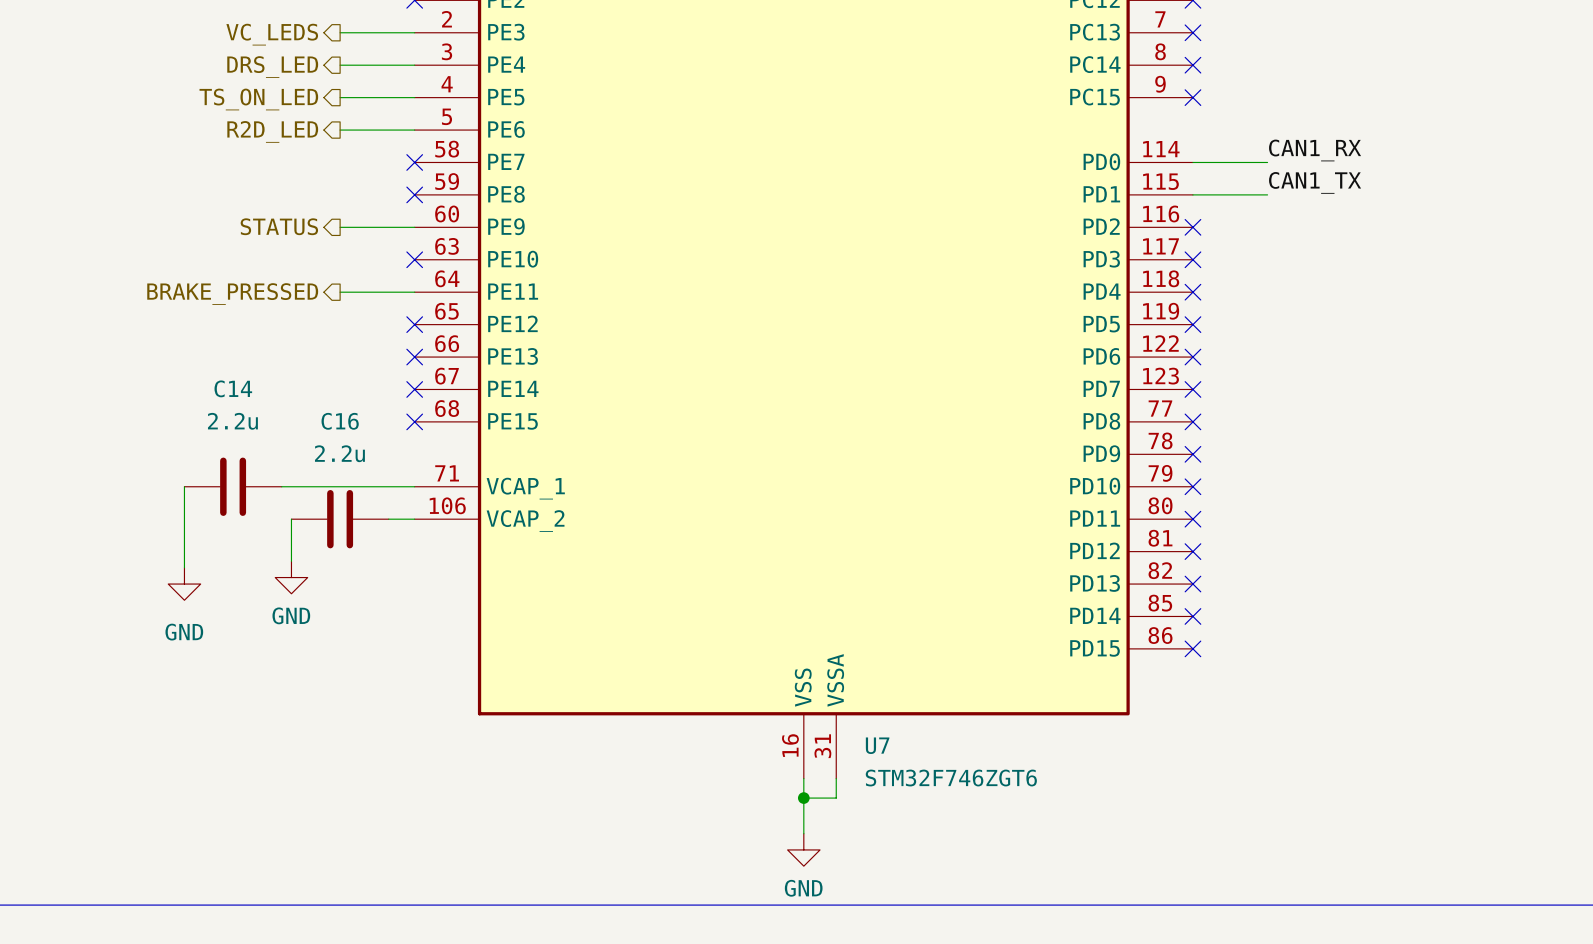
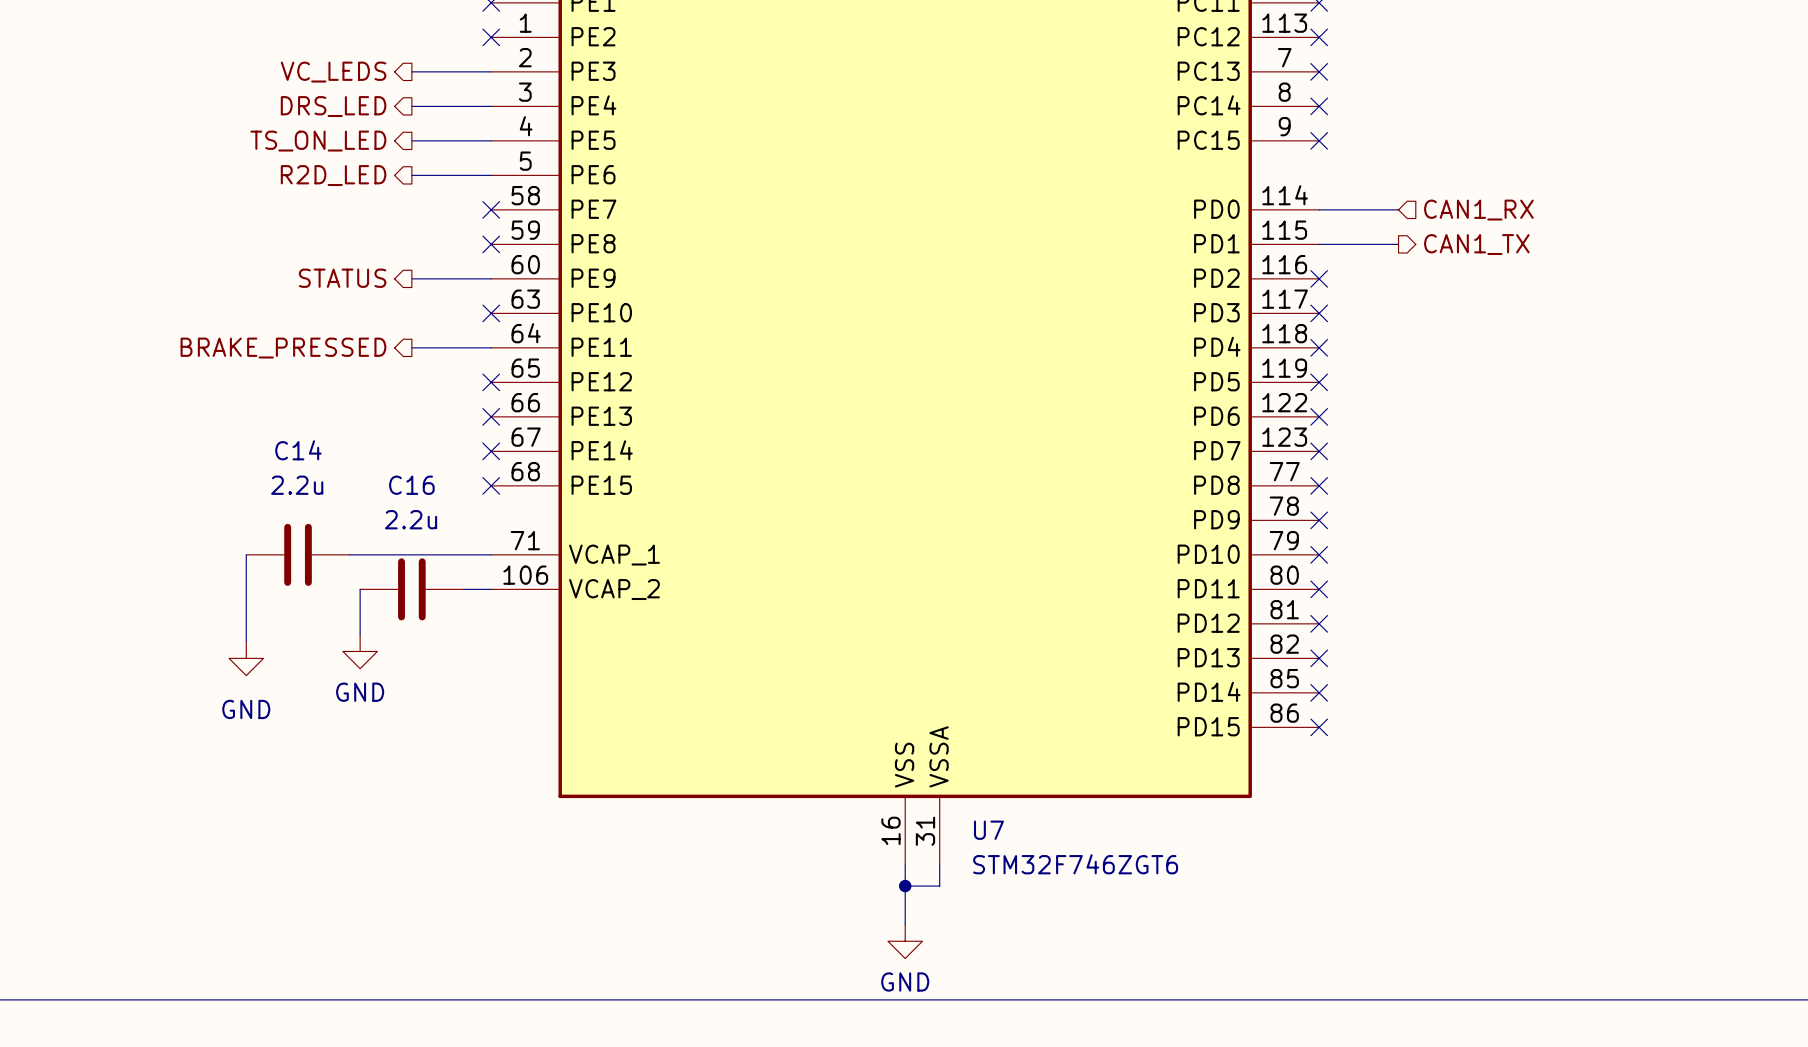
label: CAN1_RX (1315, 150) -> none
hierarchical label: none -> CAN1_RX (1478, 210)
label: CAN1_TX (1315, 182) -> none
hierarchical label: none -> CAN1_TX (1476, 244)

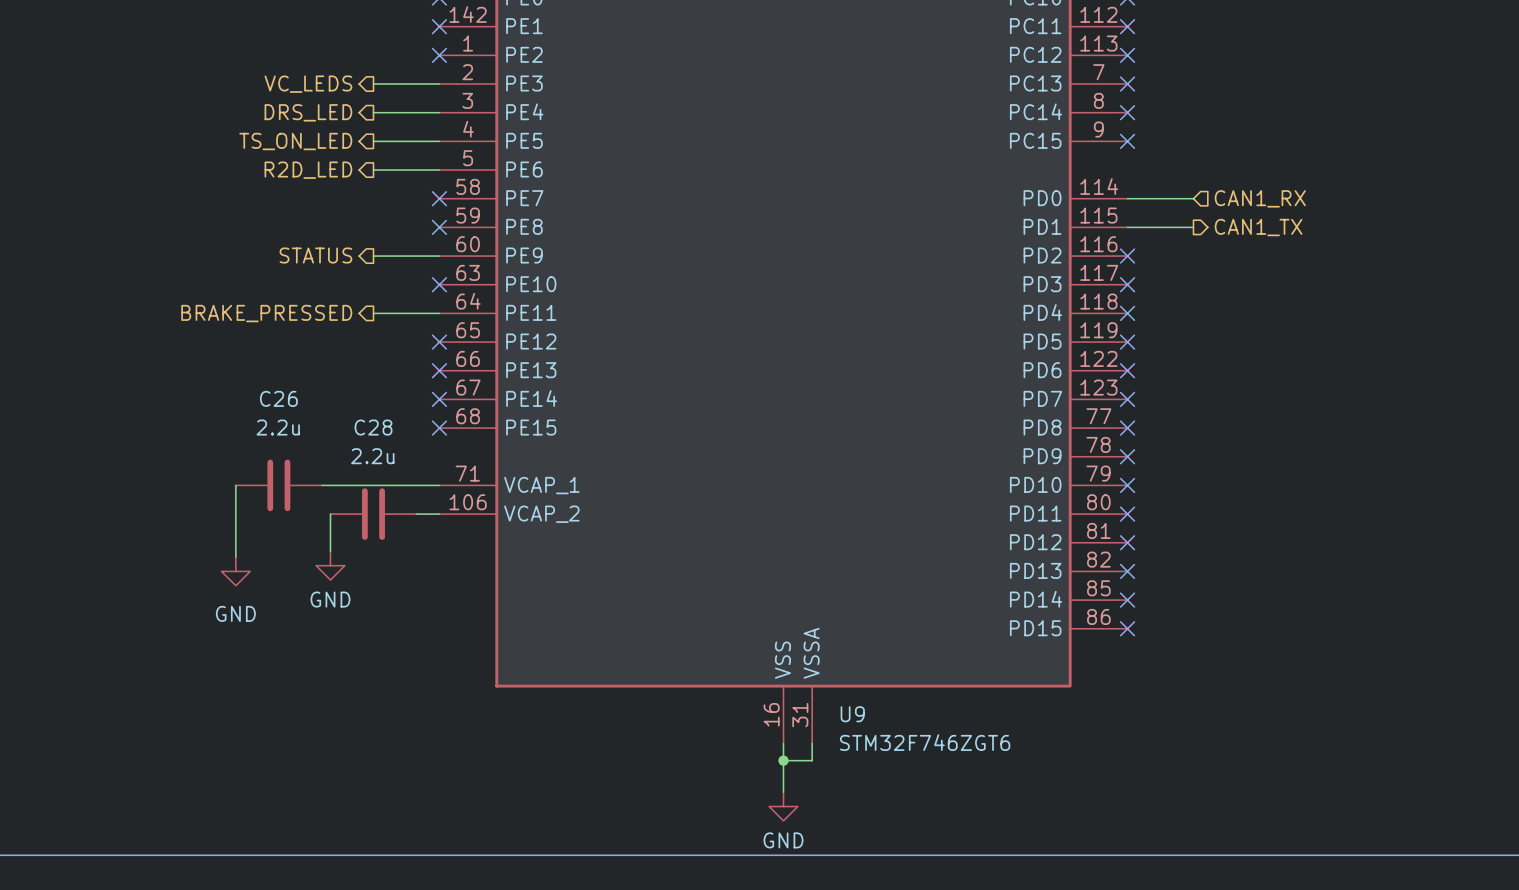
C14 name: C14 (298, 450) -> C26 (278, 398)
C16 name: C16 (411, 485) -> C28 (373, 427)
U7 name: U7 (988, 830) -> U9 (852, 714)

